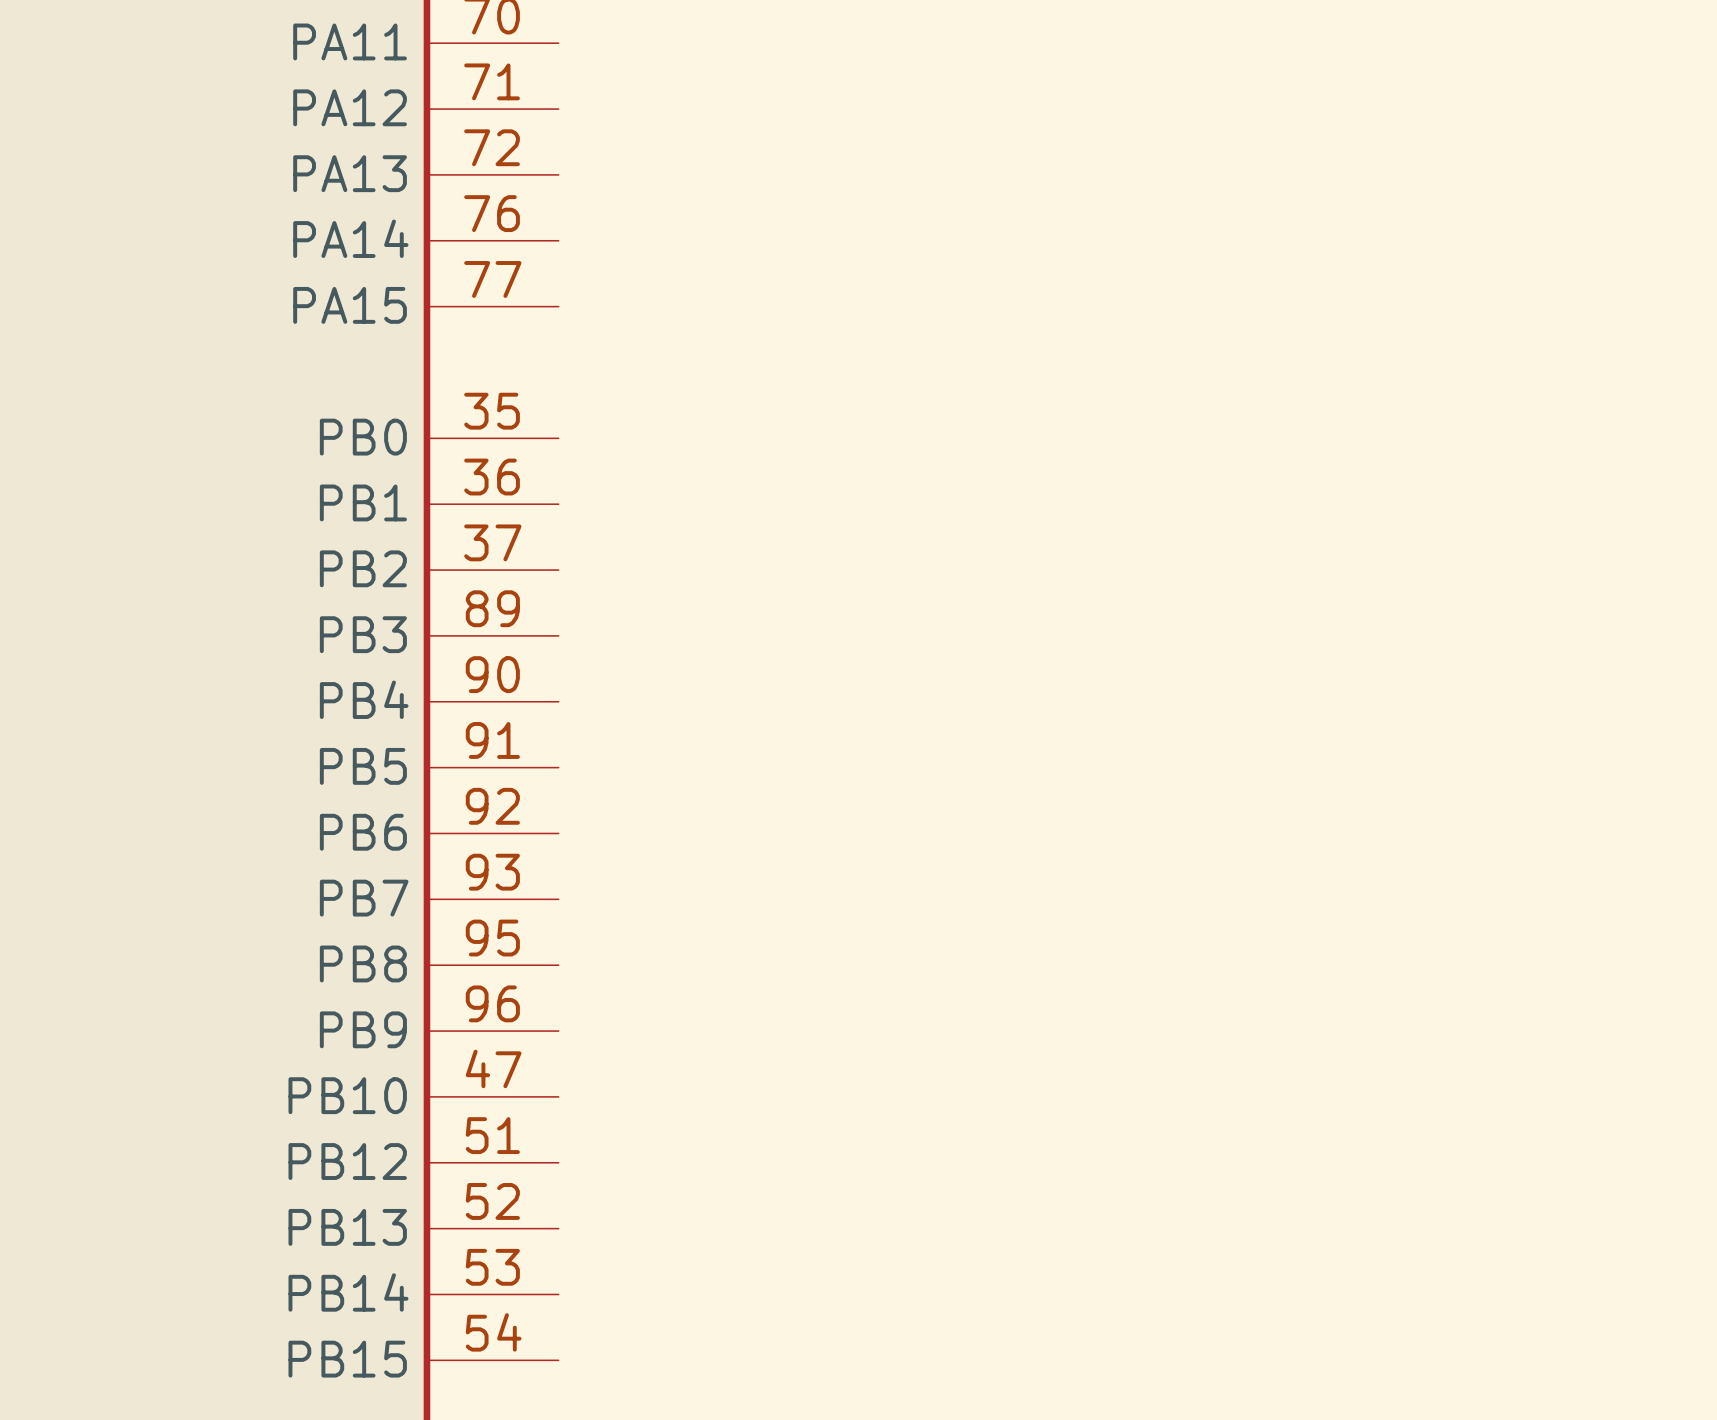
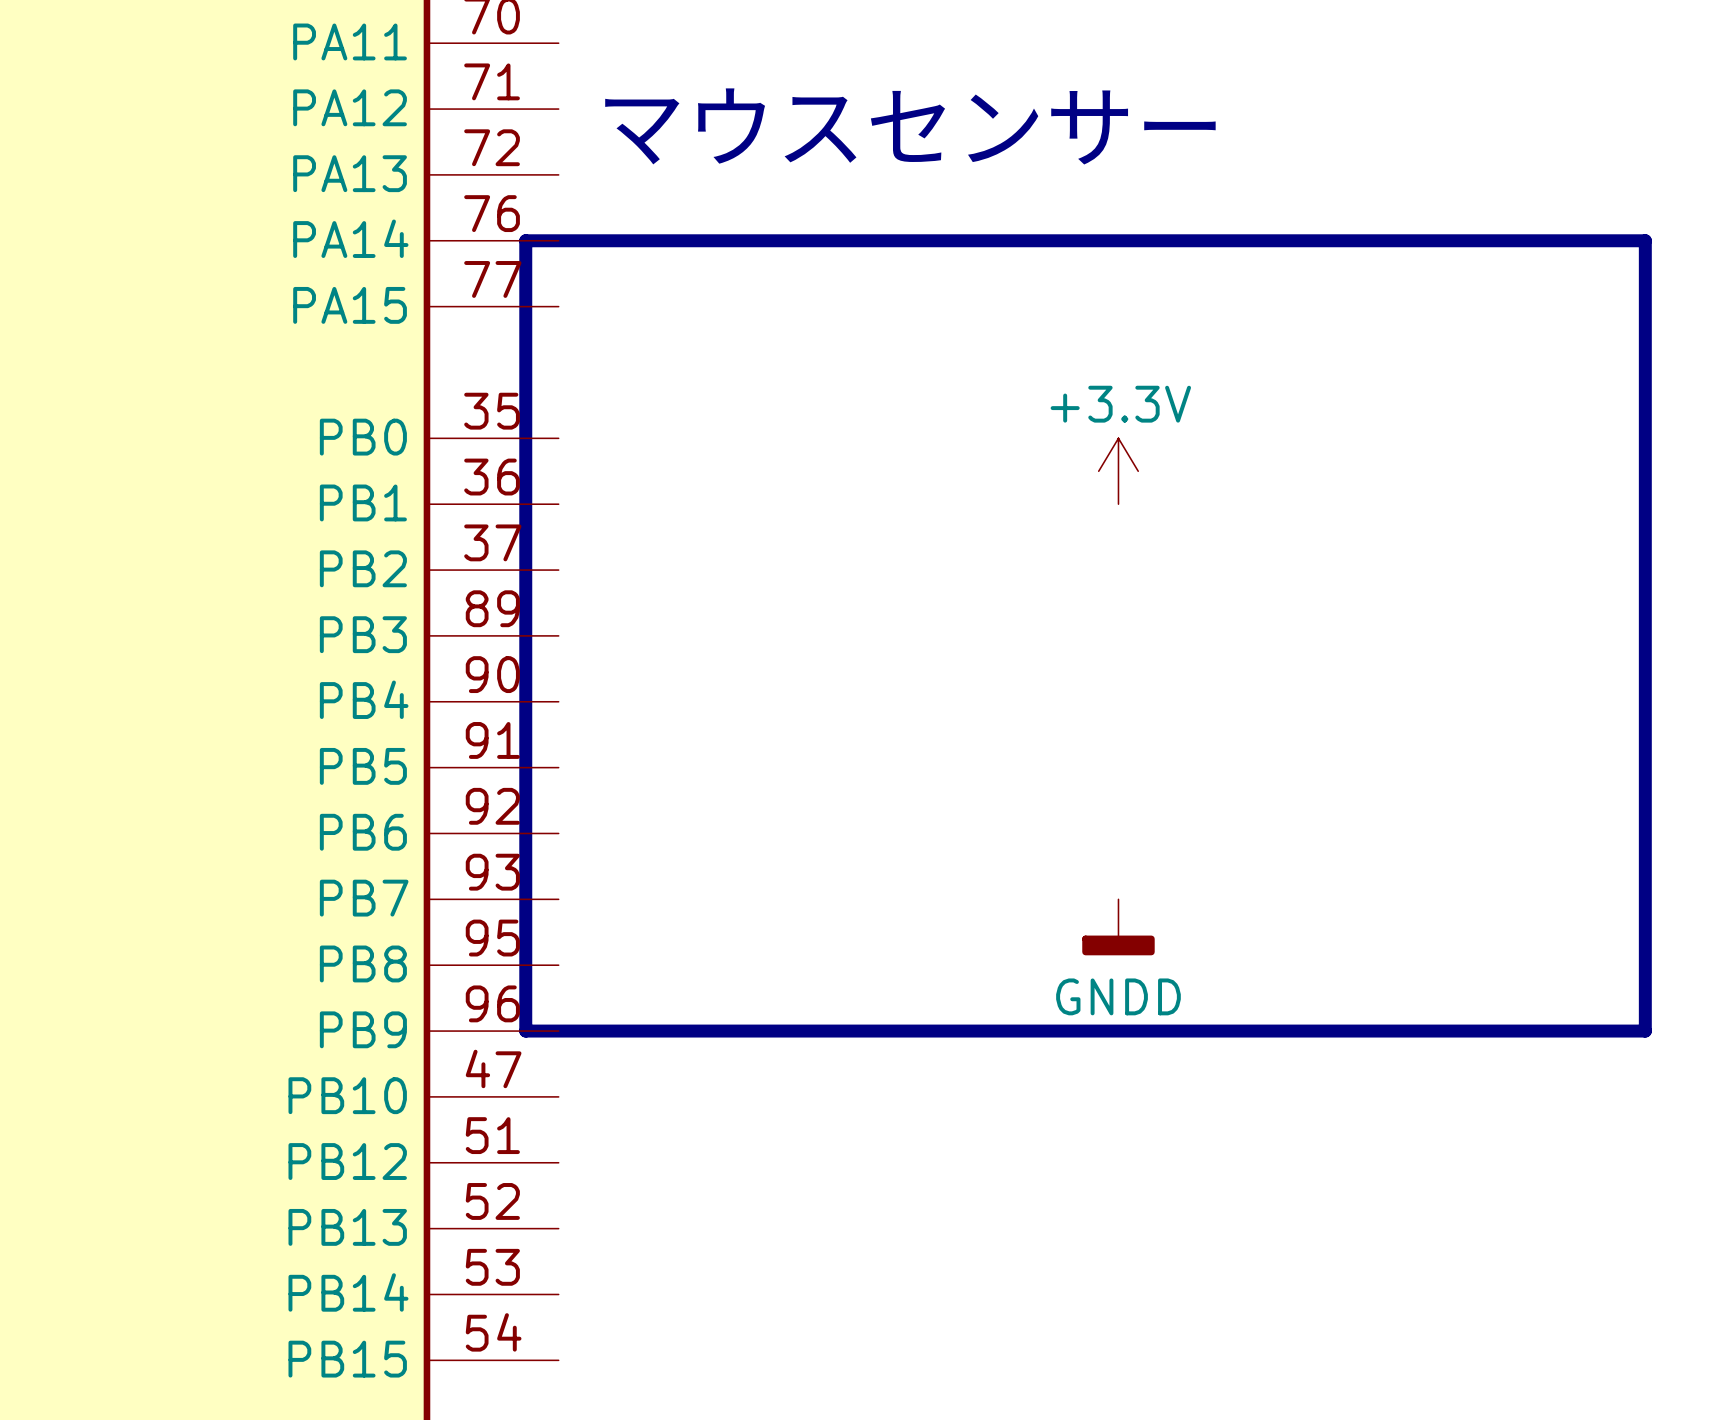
text: none -> マウスセンサー (910, 126)
line: none -> (525, 240) (1645, 240) (1645, 1031) (525, 1031) (525, 240)
power symbol: none -> +3.3V (1118, 471)
power symbol: none -> GNDD (1118, 927)

